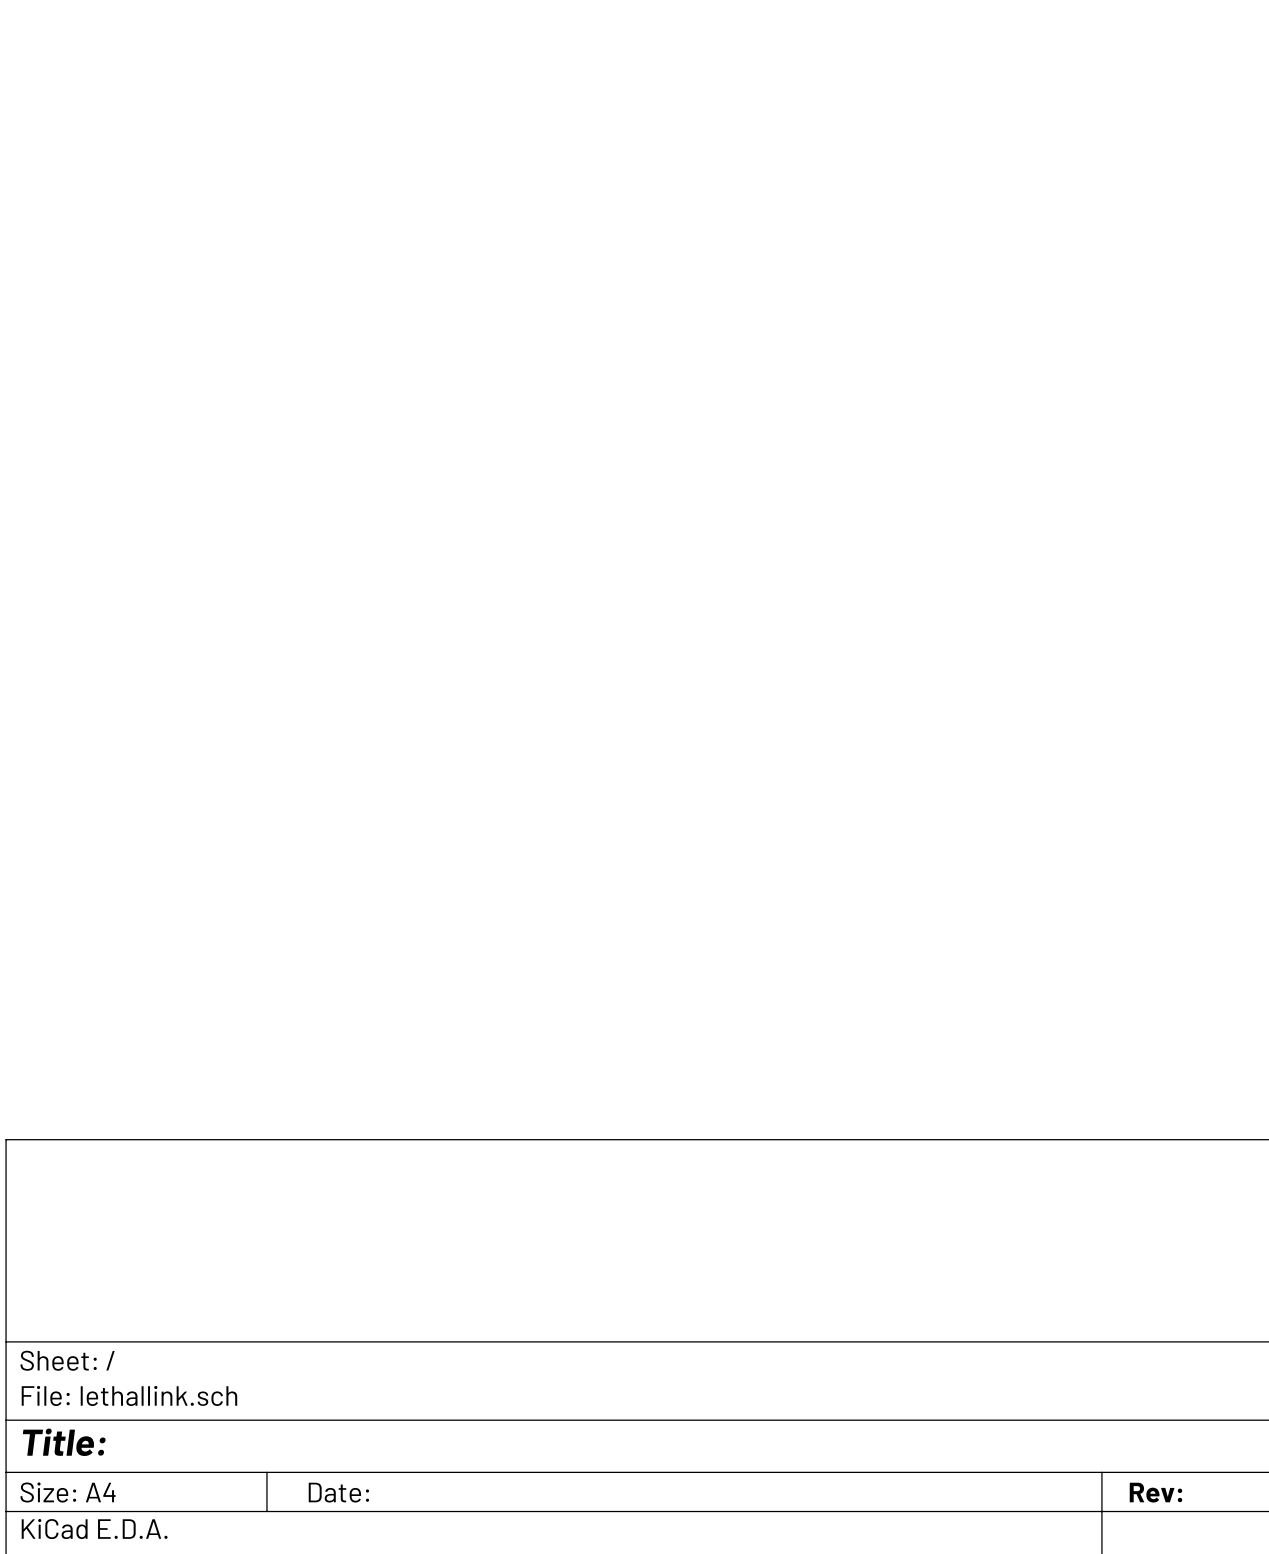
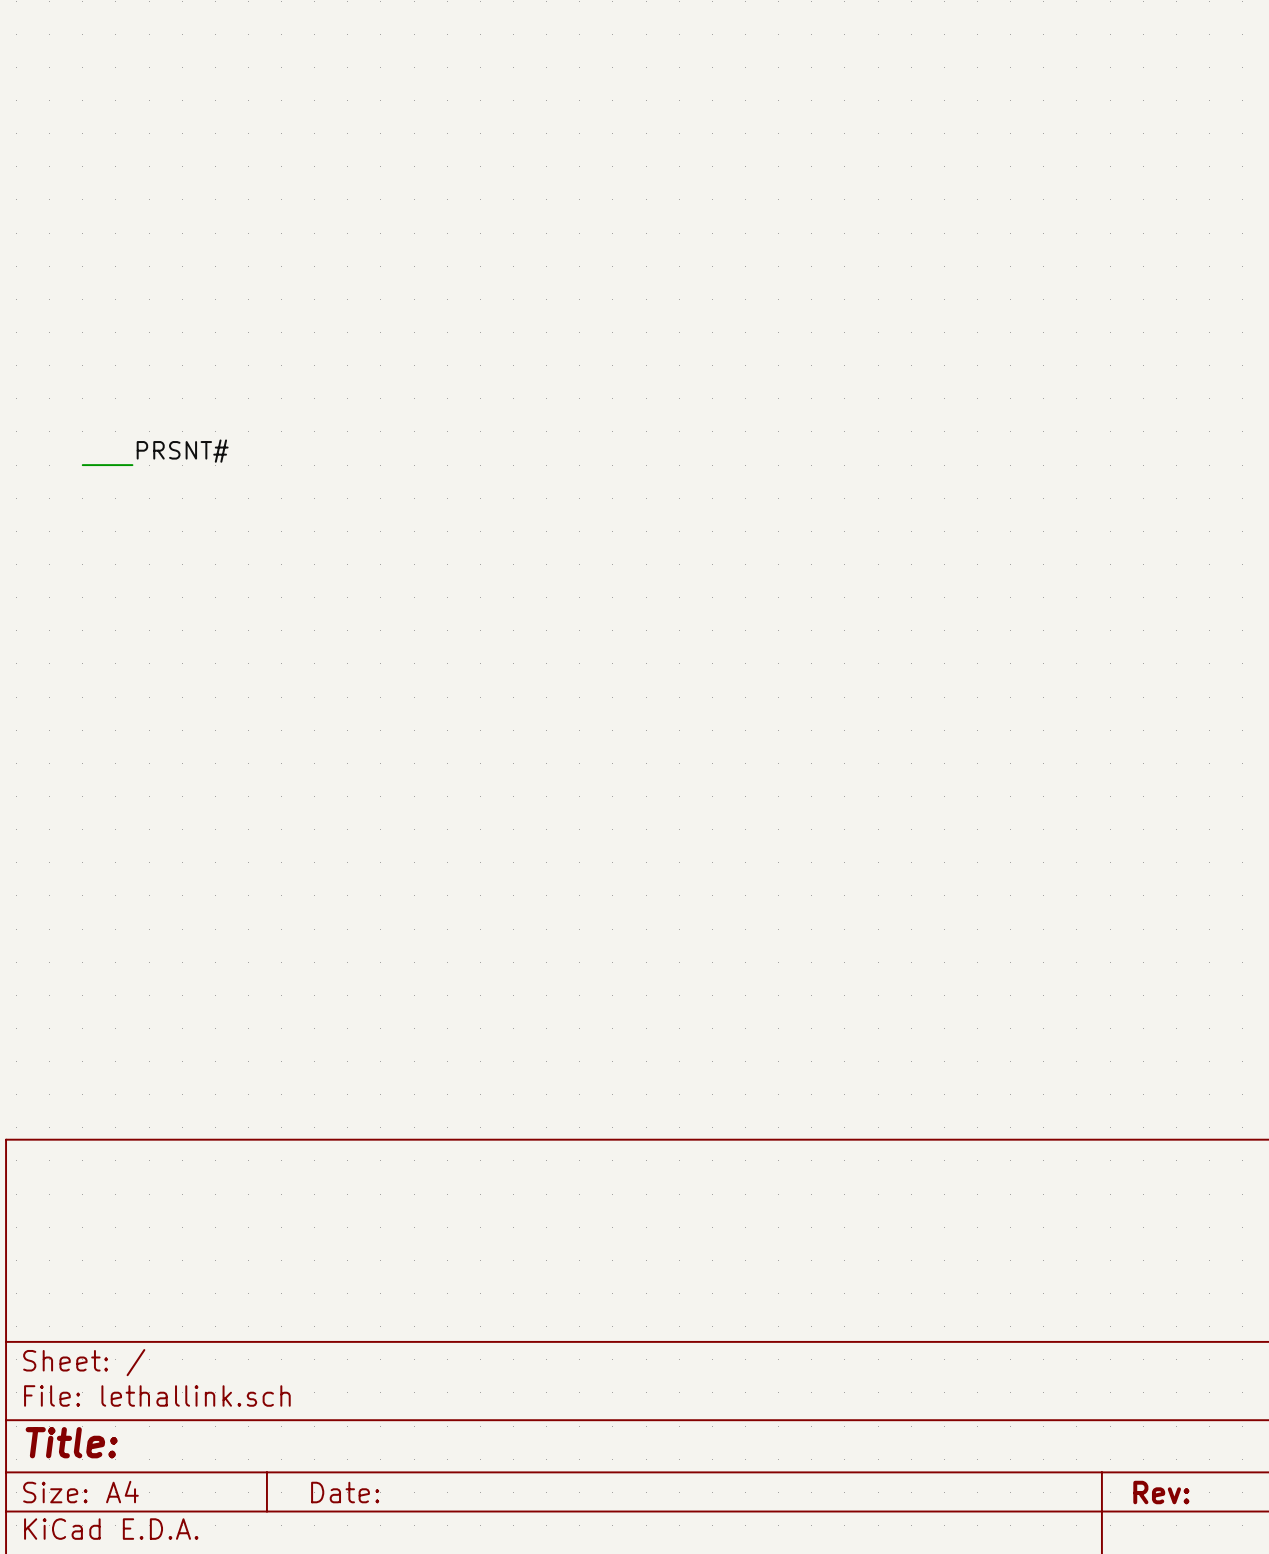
label: none -> PRSNT# (182, 451)
wire: none -> (82, 465) (132, 465)

